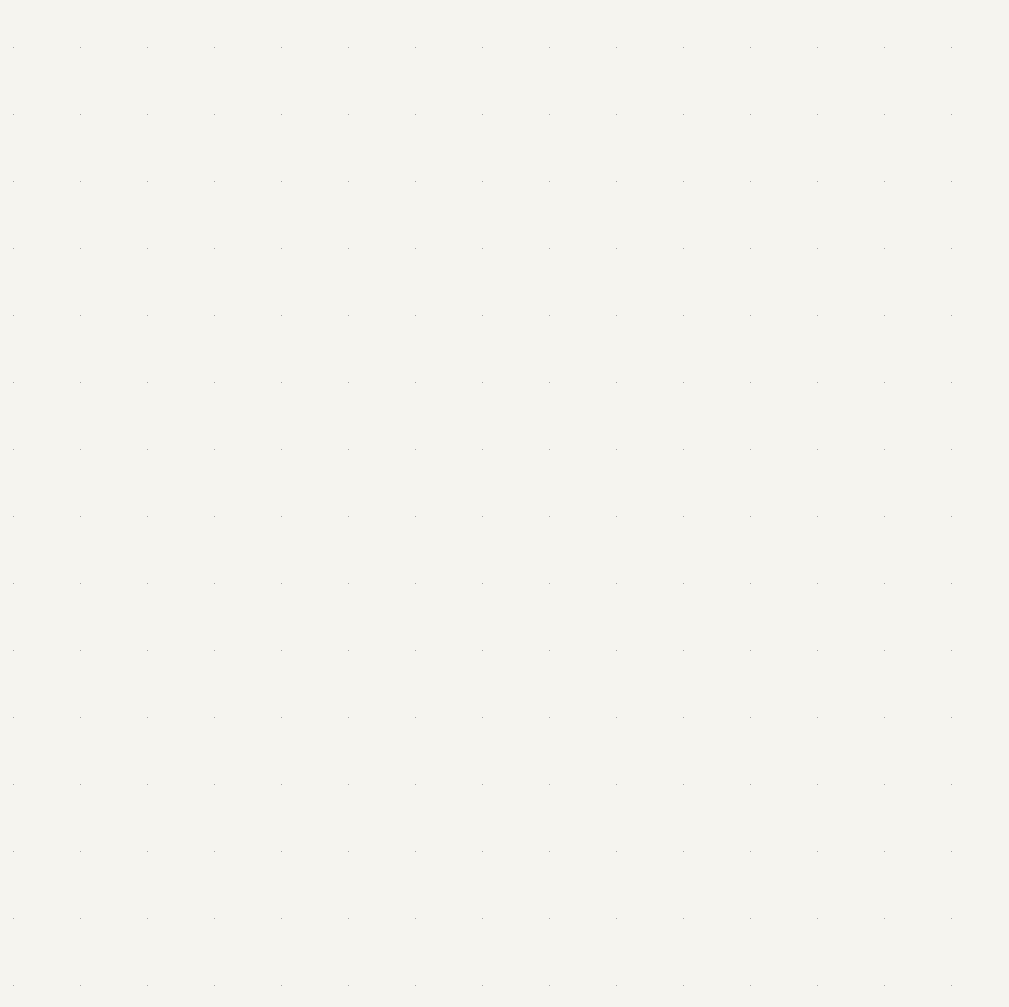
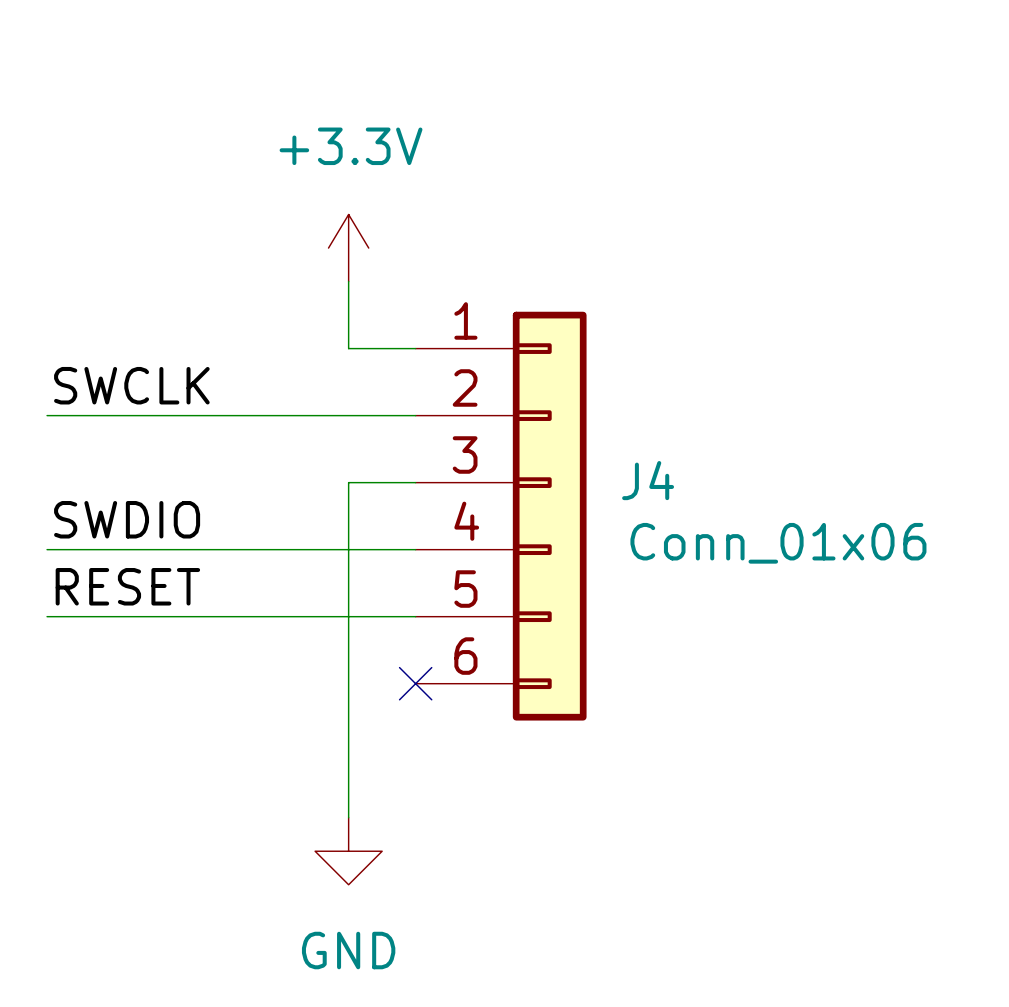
power symbol: none -> +3.3V (348, 248)
wire: none -> (348, 281) (348, 348) (415, 348)
label: none -> SWCLK (131, 385)
wire: none -> (47, 415) (415, 415)
wire: none -> (415, 482) (348, 482) (348, 817)
J4: none -> Conn_01x06 (501, 516)
label: none -> SWDIO (127, 519)
wire: none -> (47, 549) (415, 549)
label: none -> RESET (127, 586)
wire: none -> (47, 616) (415, 616)
no-connect mark: none -> (415, 683)
power symbol: none -> GND (348, 851)

